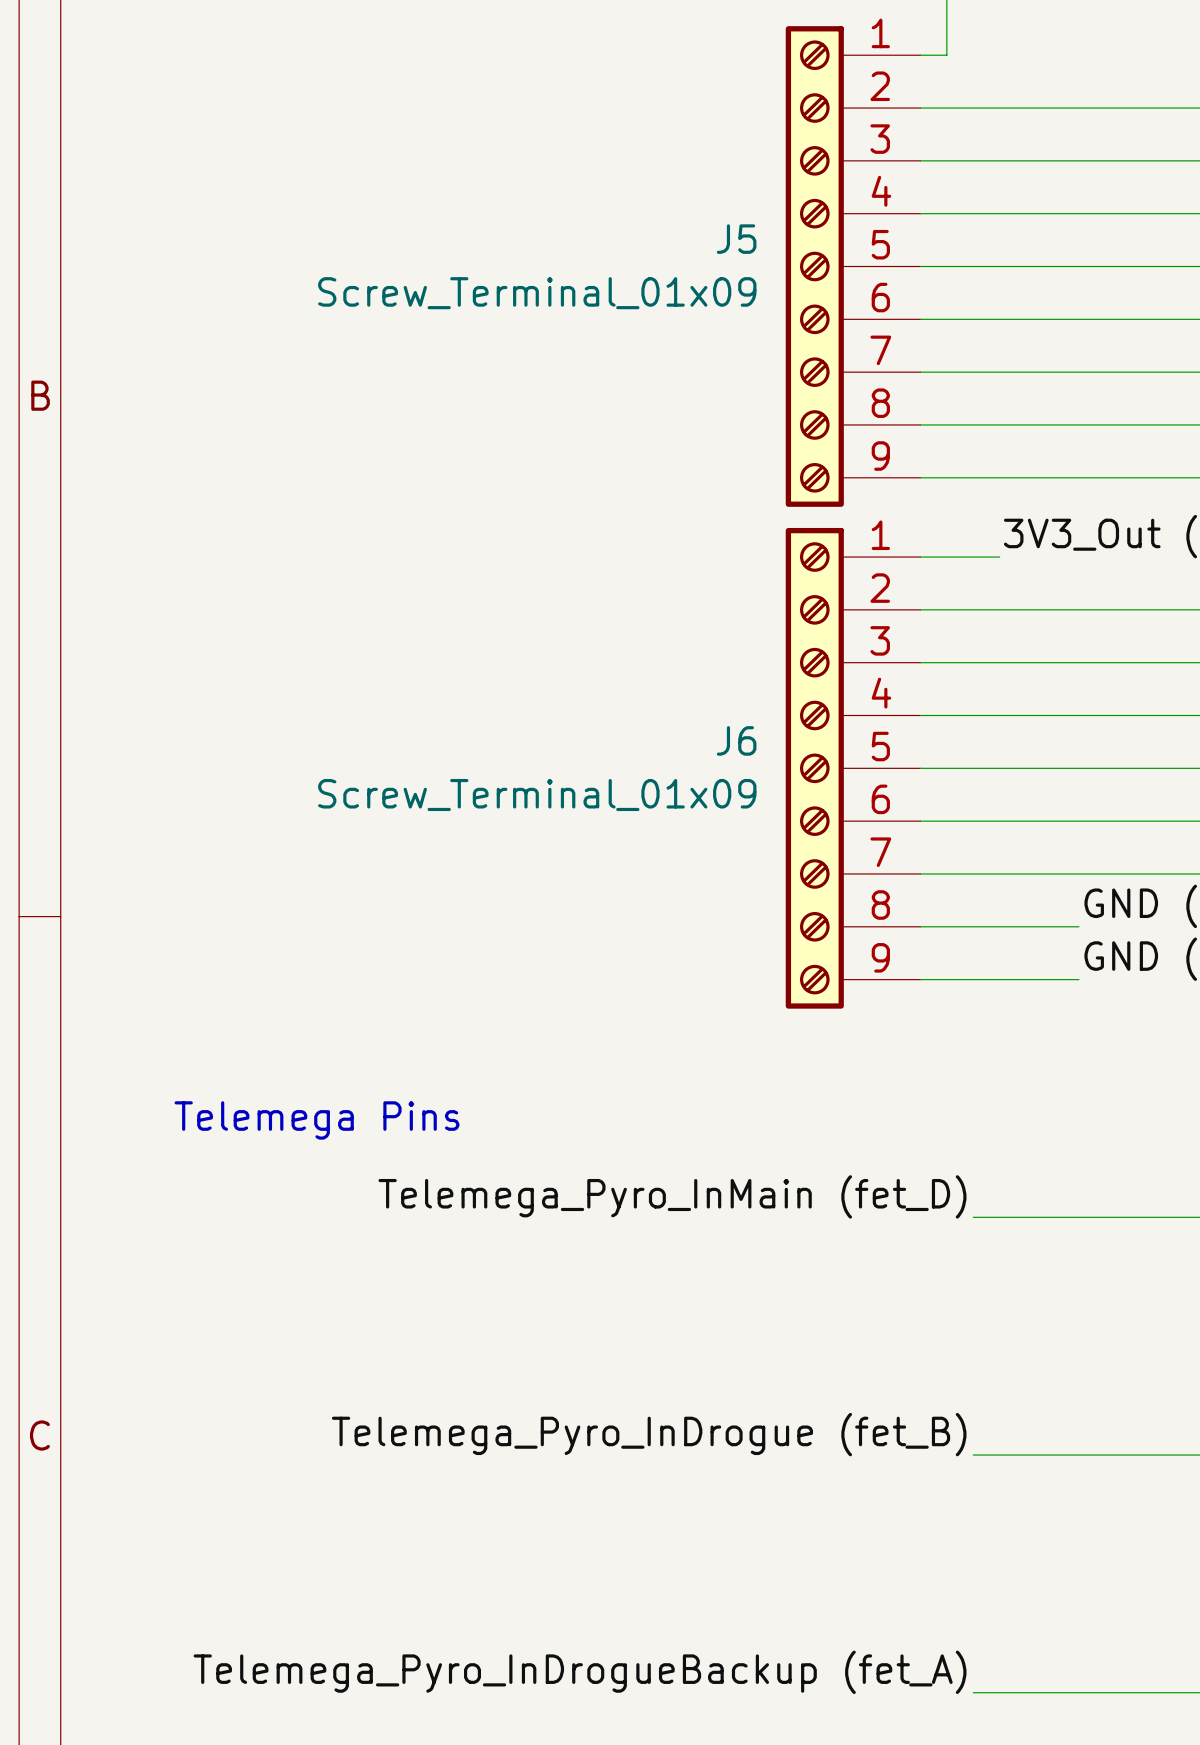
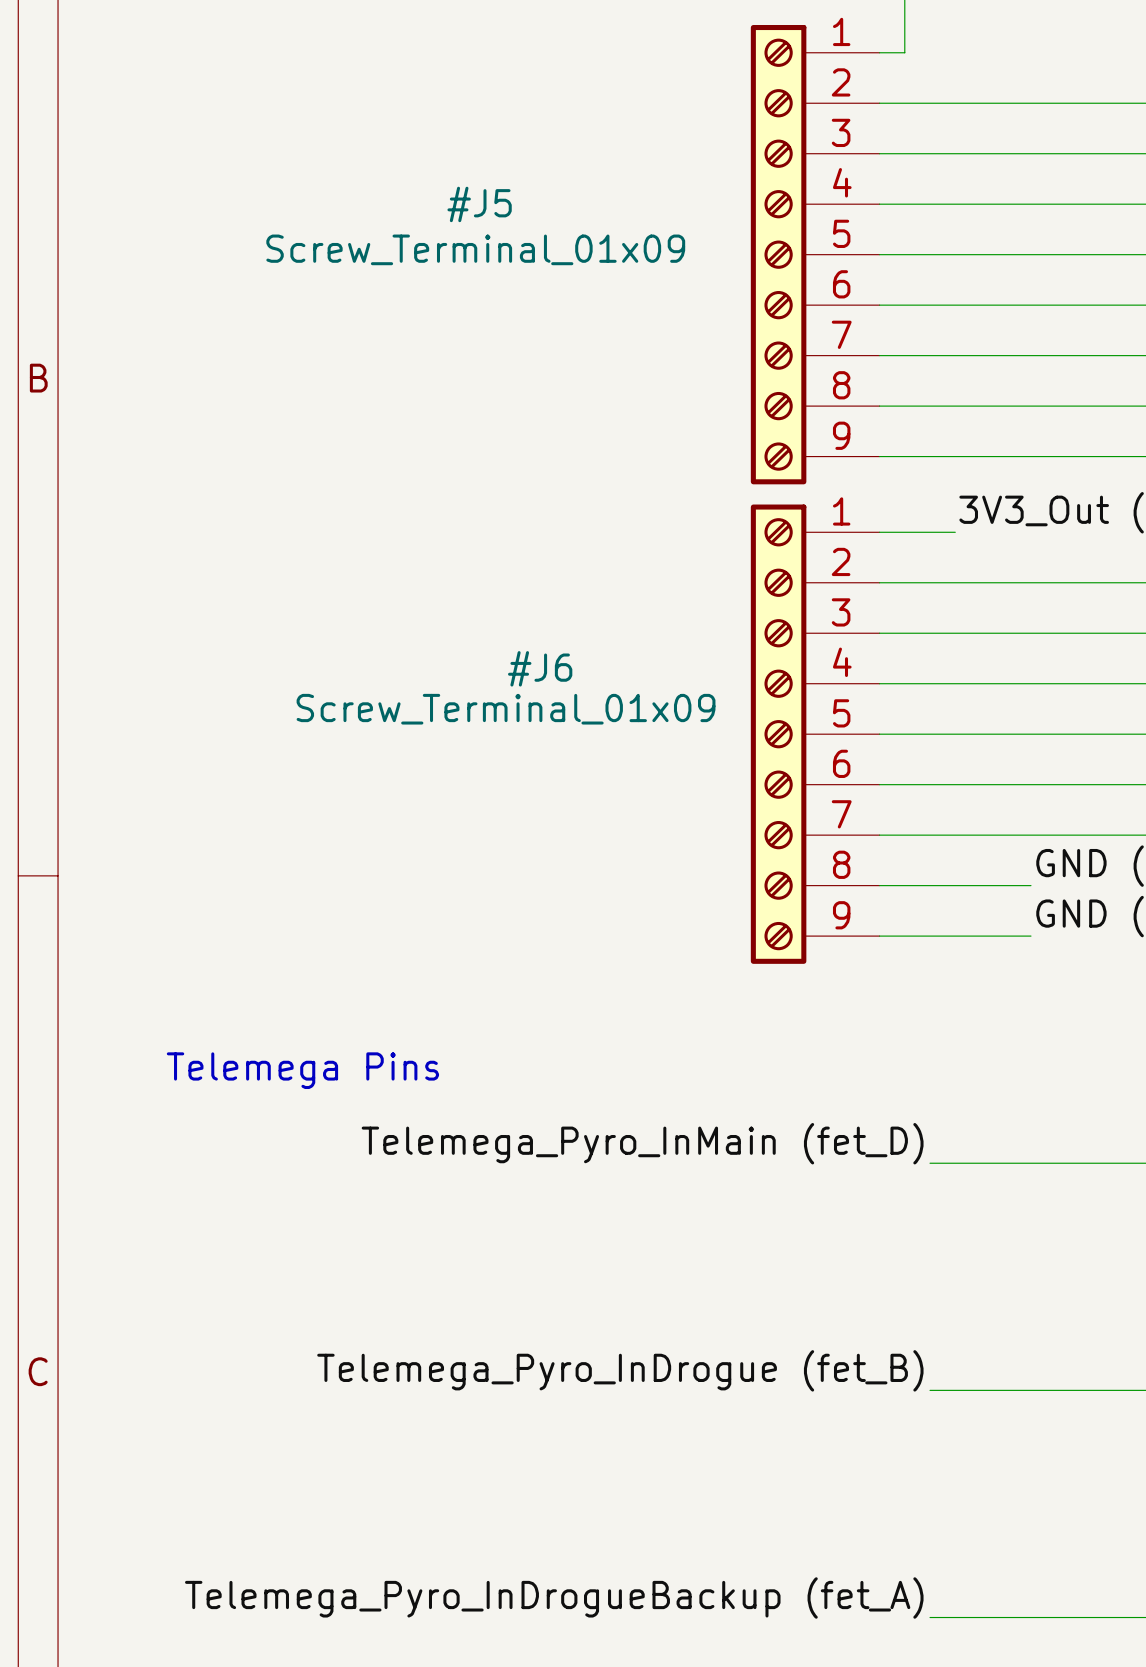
J5: Screw_Terminal_01x09 (853, 266) -> none
#J5: none -> Screw_Terminal_01x09 (815, 254)
J6: Screw_Terminal_01x09 (853, 768) -> none
#J6: none -> Screw_Terminal_01x09 (815, 734)

